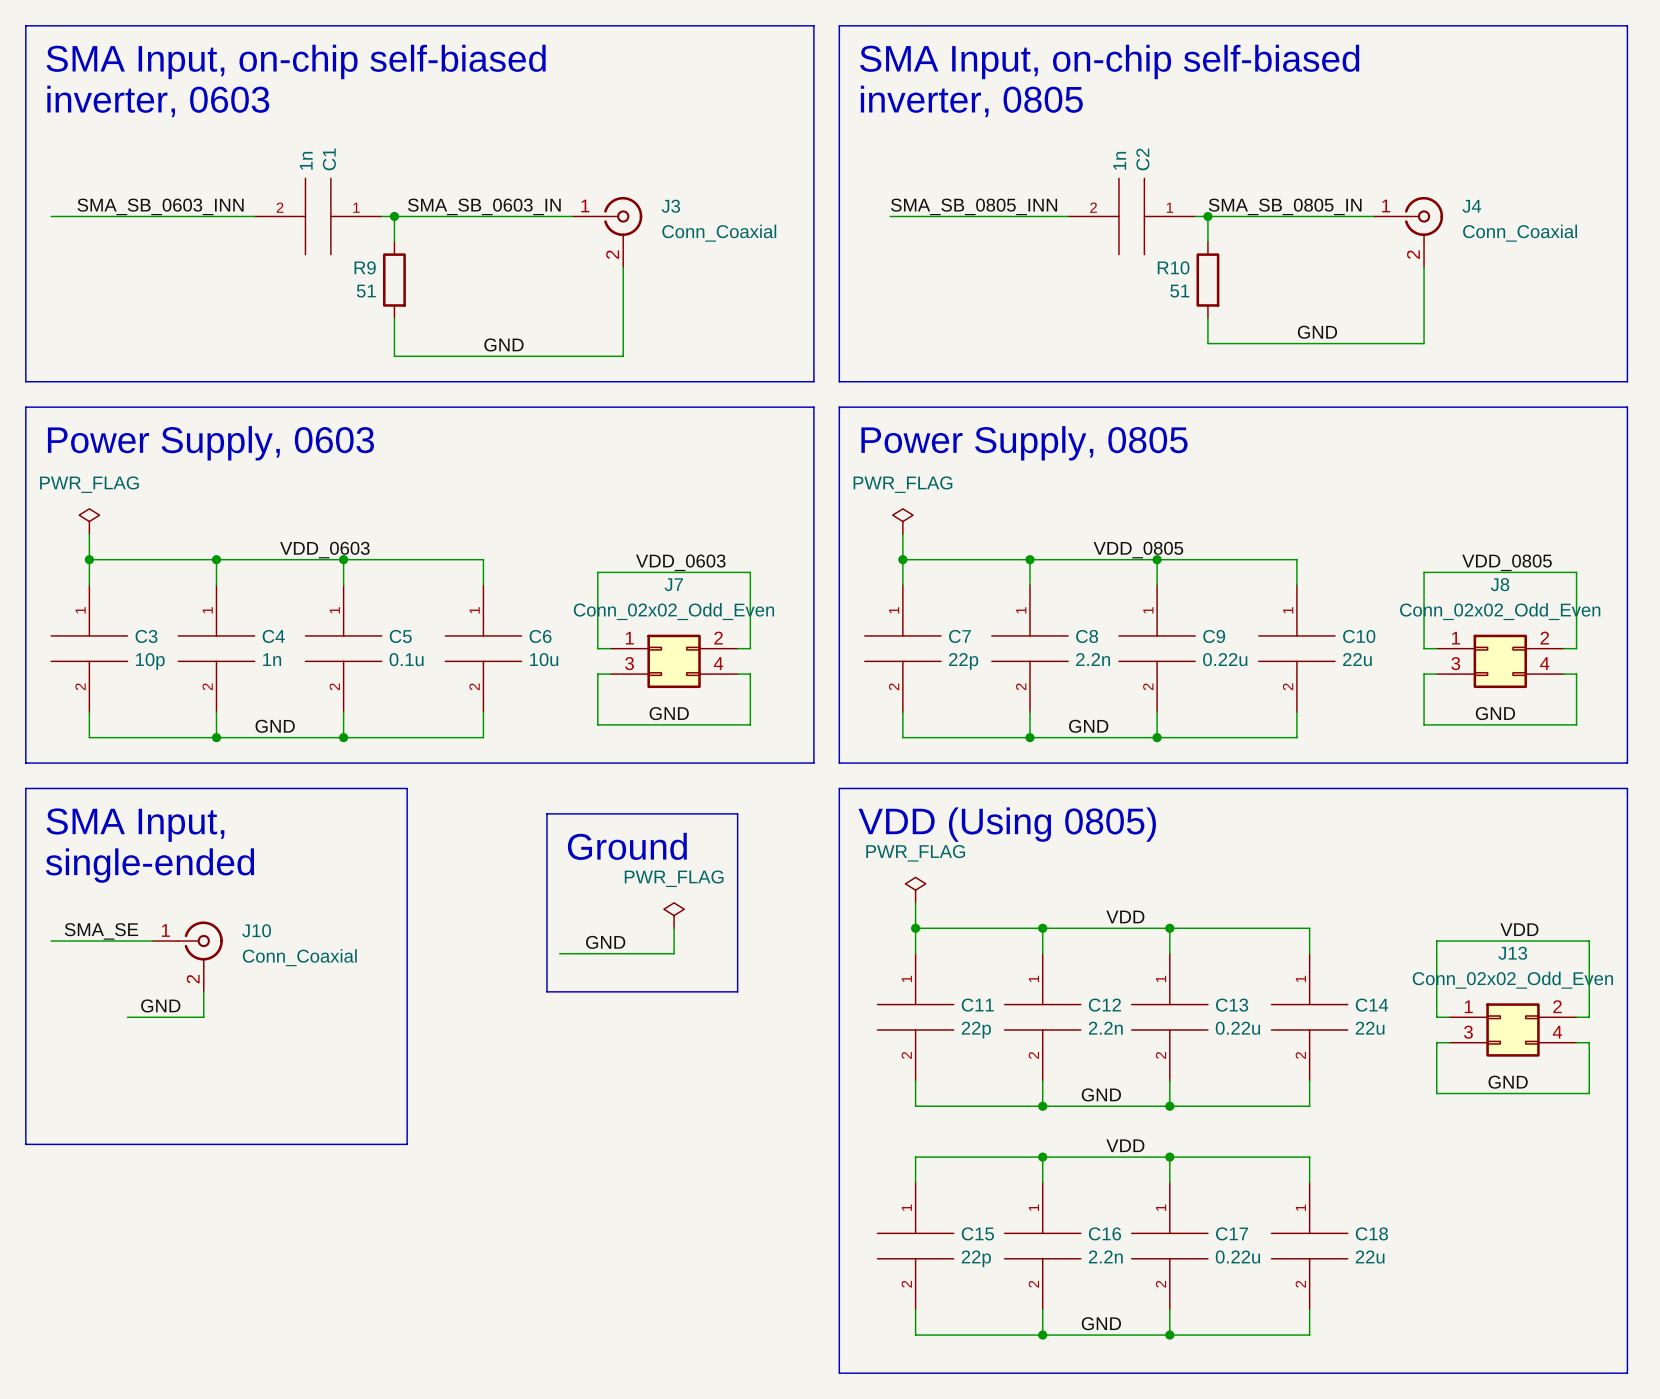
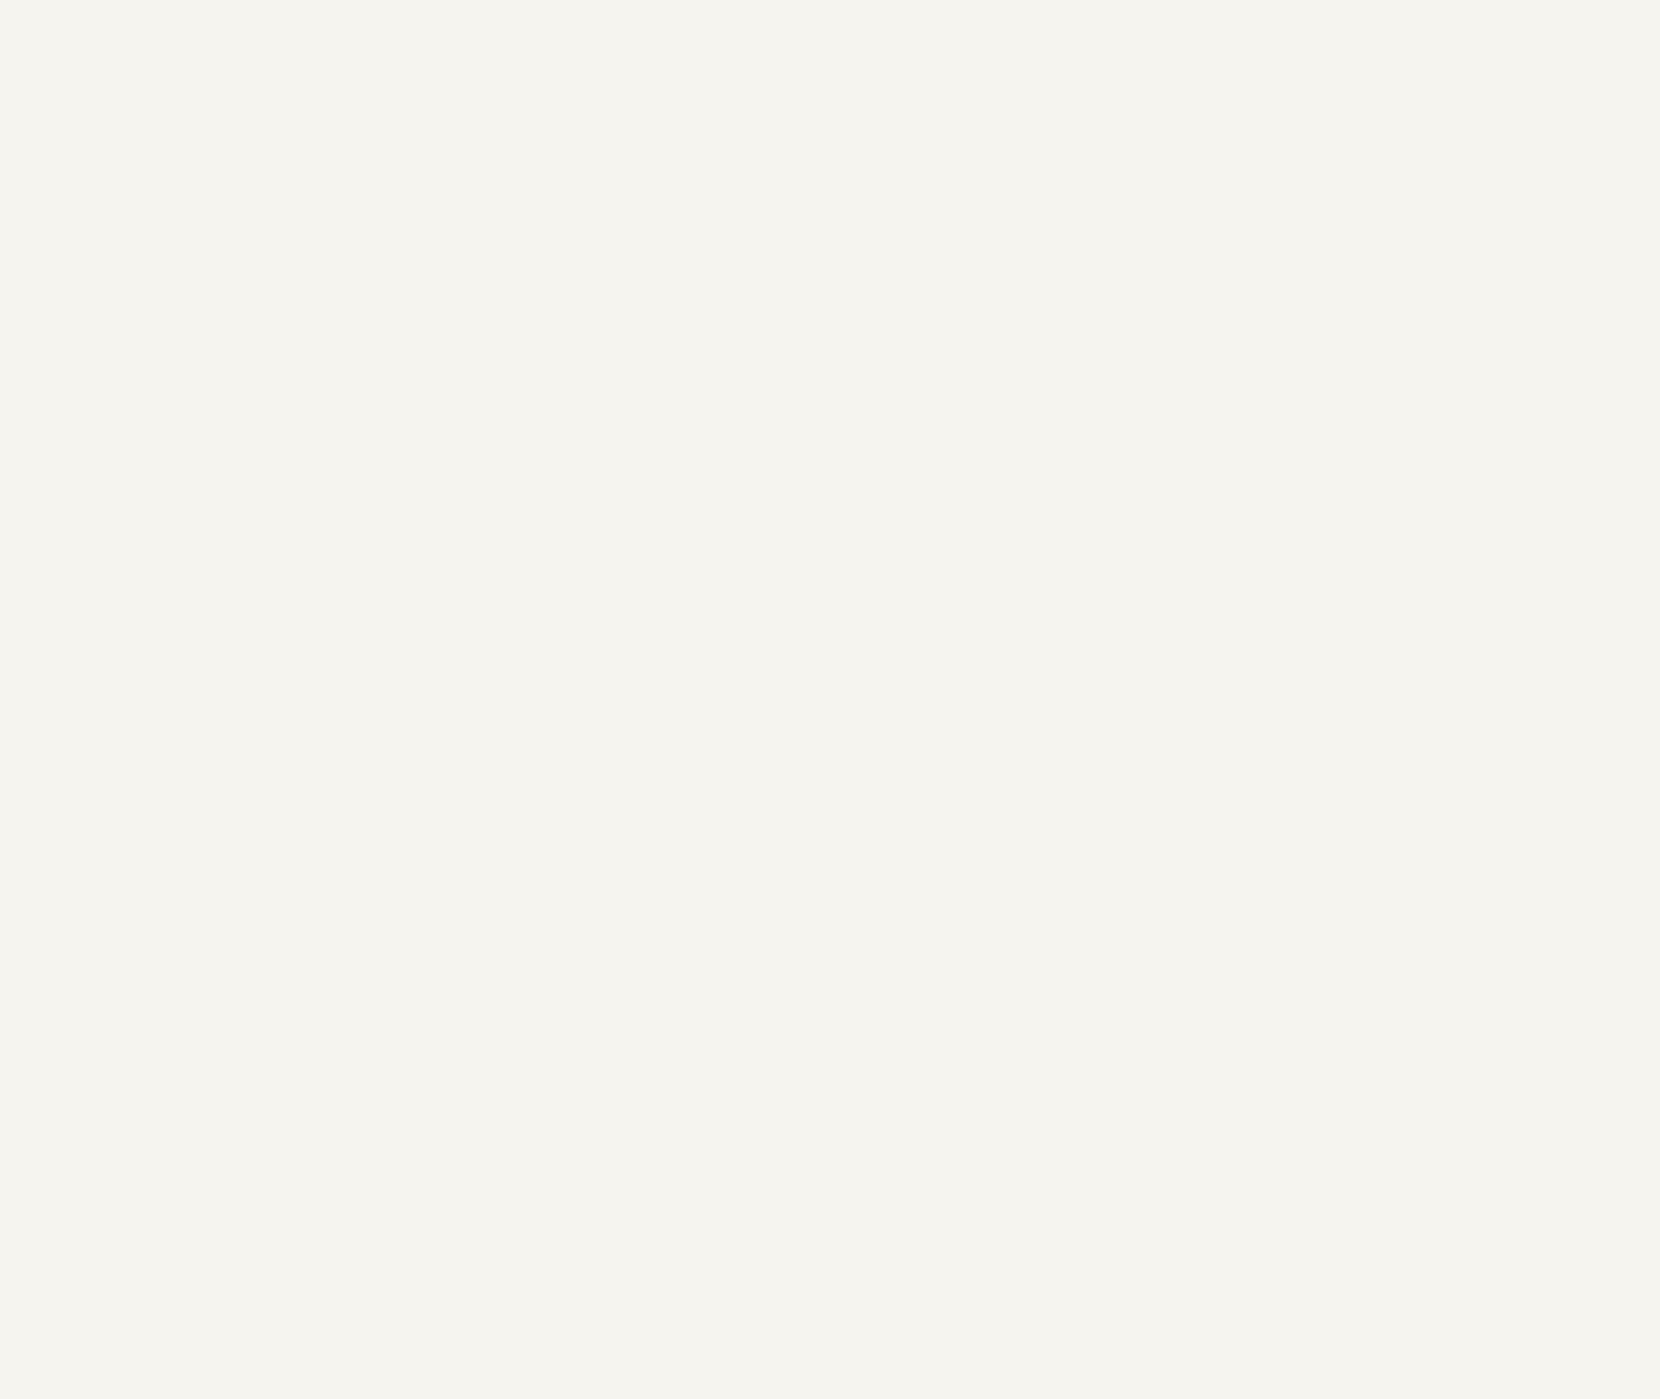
line: (25, 25) (25, 381) (813, 381) (813, 25) (25, 25) -> none
line: (839, 25) (839, 381) (1627, 381) (1627, 25) (839, 25) -> none
text: SMA Input, on-chip self-biased (296, 61) -> none
text: SMA Input, on-chip self-biased (1109, 61) -> none
text: inverter, 0603 (158, 101) -> none
text: inverter, 0805 (971, 101) -> none
label: SMA_SB_0603_INN (160, 206) -> none
label: SMA_SB_0603_IN (484, 206) -> none
label: SMA_SB_0805_INN (974, 206) -> none
label: SMA_SB_0805_IN (1285, 206) -> none
wire: (51, 216) (254, 216) -> none
C1: 1n (318, 216) -> none
wire: (381, 216) (572, 216) -> none
wire: (394, 216) (394, 241) -> none
junction: (394, 216) -> none
wire: (890, 216) (1068, 216) -> none
C2: 1n (1131, 216) -> none
wire: (1195, 216) (1373, 216) -> none
wire: (1207, 216) (1207, 241) -> none
junction: (1207, 216) -> none
J3: Conn_Coaxial (607, 232) -> none
J4: Conn_Coaxial (1408, 232) -> none
wire: (623, 267) (623, 356) (394, 356) (394, 318) -> none
wire: (1424, 267) (1424, 343) (1207, 343) (1207, 318) -> none
R9: 51 (394, 280) -> none
R10: 51 (1207, 280) -> none
label: GND (1317, 332) -> none
label: GND (503, 344) -> none
line: (25, 407) (813, 407) (813, 763) (25, 763) (25, 407) -> none
line: (839, 407) (839, 763) (1627, 763) (1627, 407) (839, 407) -> none
text: Power Supply, 0603 (210, 443) -> none
text: Power Supply, 0805 (1024, 443) -> none
power symbol: PWR_FLAG (89, 521) -> none
power symbol: PWR_FLAG (902, 521) -> none
wire: (89, 534) (89, 585) -> none
wire: (902, 534) (902, 585) -> none
label: VDD_0603 (324, 550) -> none
label: VDD_0805 (1138, 550) -> none
wire: (89, 559) (483, 559) (483, 585) -> none
junction: (89, 559) -> none
wire: (216, 559) (216, 585) -> none
junction: (216, 559) -> none
wire: (343, 559) (343, 585) -> none
junction: (343, 559) -> none
wire: (902, 559) (1296, 559) (1296, 585) -> none
junction: (902, 559) -> none
wire: (1029, 559) (1029, 585) -> none
junction: (1029, 559) -> none
wire: (1157, 559) (1157, 585) -> none
junction: (1157, 559) -> none
label: VDD_0603 (680, 562) -> none
label: VDD_0805 (1507, 562) -> none
C3: 10p (89, 648) -> none
C4: 1n (216, 648) -> none
C5: 0.1u (343, 648) -> none
C6: 10u (483, 648) -> none
wire: (610, 648) (597, 648) (597, 572) (750, 572) (750, 648) (737, 648) -> none
C7: 22p (902, 648) -> none
C8: 2.2n (1029, 648) -> none
C9: 0.22u (1157, 648) -> none
C10: 22u (1296, 648) -> none
wire: (1436, 648) (1424, 648) (1424, 572) (1576, 572) (1576, 648) (1563, 648) -> none
J7: Conn_02x02_Odd_Even (674, 661) -> none
J8: Conn_02x02_Odd_Even (1500, 661) -> none
wire: (610, 674) (597, 674) (597, 724) (750, 724) (750, 674) (737, 674) -> none
wire: (1436, 674) (1424, 674) (1424, 724) (1576, 724) (1576, 674) (1563, 674) -> none
wire: (89, 712) (89, 737) (483, 737) (483, 712) -> none
wire: (216, 712) (216, 737) -> none
wire: (343, 712) (343, 737) -> none
wire: (902, 712) (902, 737) (1296, 737) (1296, 712) -> none
wire: (1029, 712) (1029, 737) -> none
wire: (1157, 712) (1157, 737) -> none
label: GND (669, 713) -> none
label: GND (1495, 713) -> none
label: GND (275, 726) -> none
label: GND (1088, 726) -> none
junction: (216, 737) -> none
junction: (343, 737) -> none
junction: (1029, 737) -> none
junction: (1157, 737) -> none
line: (25, 788) (407, 788) (407, 1144) (25, 1144) (25, 788) -> none
line: (839, 788) (1627, 788) (1627, 1373) (839, 1373) (839, 788) -> none
line: (546, 813) (737, 813) (737, 991) (546, 991) (546, 813) -> none
text: VDD (Using 0805) (1007, 824) -> none
text: SMA Input, (135, 825) -> none
text: Ground (627, 846) -> none
text: single-ended (150, 865) -> none
power symbol: PWR_FLAG (915, 890) -> none
wire: (915, 902) (915, 953) -> none
power symbol: PWR_FLAG (674, 915) -> none
label: VDD (1125, 916) -> none
wire: (674, 928) (674, 953) (559, 953) -> none
wire: (915, 928) (1309, 928) (1309, 953) -> none
junction: (915, 928) -> none
wire: (1042, 928) (1042, 953) -> none
junction: (1042, 928) -> none
wire: (1169, 928) (1169, 953) -> none
junction: (1169, 928) -> none
label: VDD (1519, 929) -> none
label: SMA_SE (101, 931) -> none
wire: (51, 941) (152, 941) -> none
label: GND (605, 942) -> none
J10: Conn_Coaxial (187, 956) -> none
wire: (203, 991) (203, 1017) (127, 1017) -> none
label: GND (160, 1005) -> none
C11: 22p (915, 1017) -> none
C12: 2.2n (1042, 1017) -> none
C13: 0.22u (1169, 1017) -> none
C14: 22u (1309, 1017) -> none
wire: (1449, 1017) (1436, 1017) (1436, 941) (1589, 941) (1589, 1017) (1576, 1017) -> none
J13: Conn_02x02_Odd_Even (1513, 1029) -> none
wire: (1449, 1042) (1436, 1042) (1436, 1093) (1589, 1093) (1589, 1042) (1576, 1042) -> none
wire: (915, 1080) (915, 1106) (1309, 1106) (1309, 1080) -> none
wire: (1042, 1080) (1042, 1106) -> none
wire: (1169, 1080) (1169, 1106) -> none
label: GND (1508, 1082) -> none
label: GND (1101, 1094) -> none
junction: (1042, 1106) -> none
junction: (1169, 1106) -> none
label: VDD (1125, 1145) -> none
wire: (1042, 1157) (1042, 1182) -> none
junction: (1042, 1157) -> none
wire: (1169, 1157) (1169, 1182) -> none
junction: (1169, 1157) -> none
wire: (915, 1182) (915, 1157) (1309, 1157) (1309, 1182) -> none
C15: 22p (915, 1246) -> none
C16: 2.2n (1042, 1246) -> none
C17: 0.22u (1169, 1246) -> none
C18: 22u (1309, 1246) -> none
wire: (915, 1309) (915, 1335) (1309, 1335) (1309, 1309) -> none
wire: (1042, 1309) (1042, 1335) -> none
wire: (1169, 1309) (1169, 1335) -> none
label: GND (1101, 1323) -> none
junction: (1042, 1335) -> none
junction: (1169, 1335) -> none

